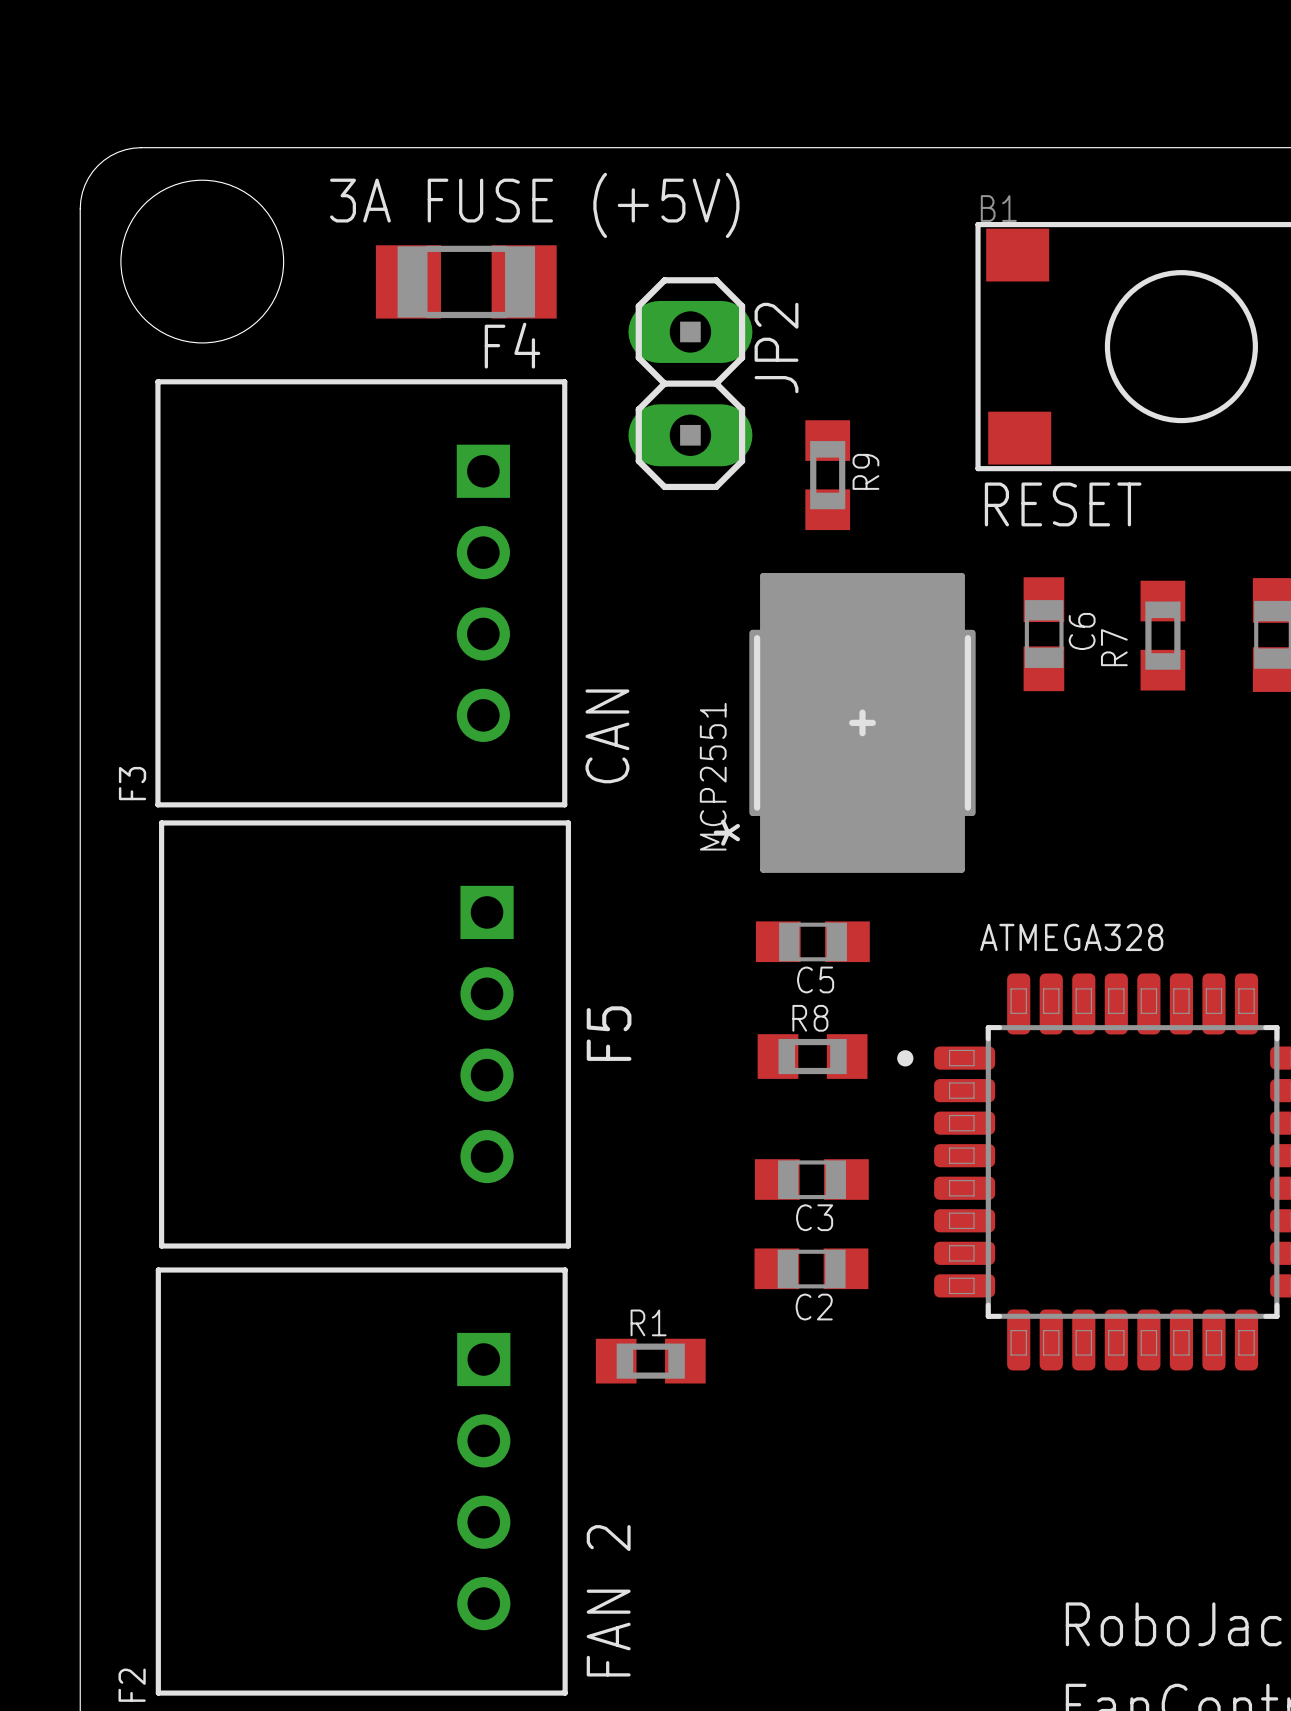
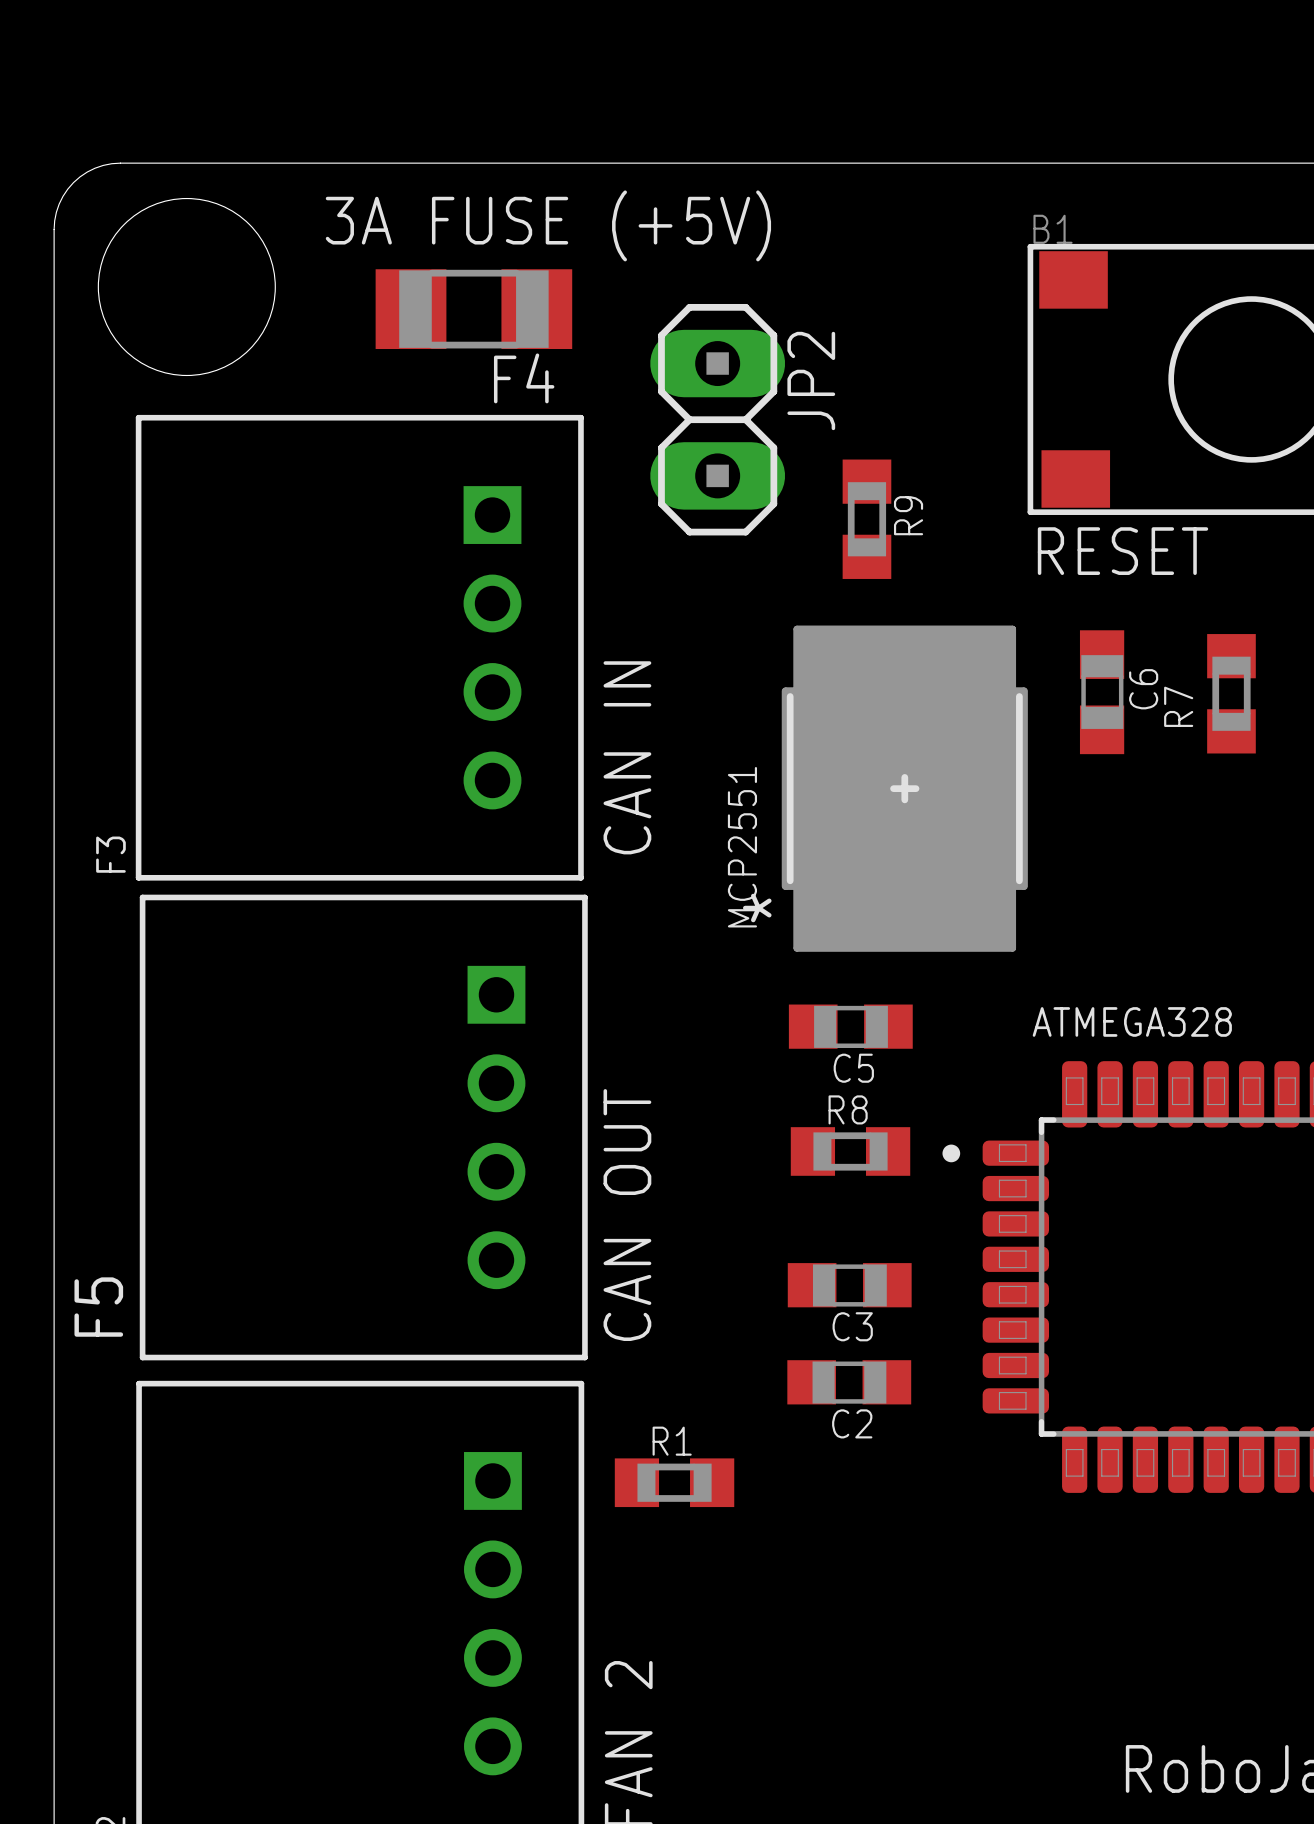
text: CAN (607, 736) -> CAN IN (627, 757)
F5 name position: F5 (609, 1033) -> F5 (98, 1307)
text: none -> CAN OUT (627, 1215)

